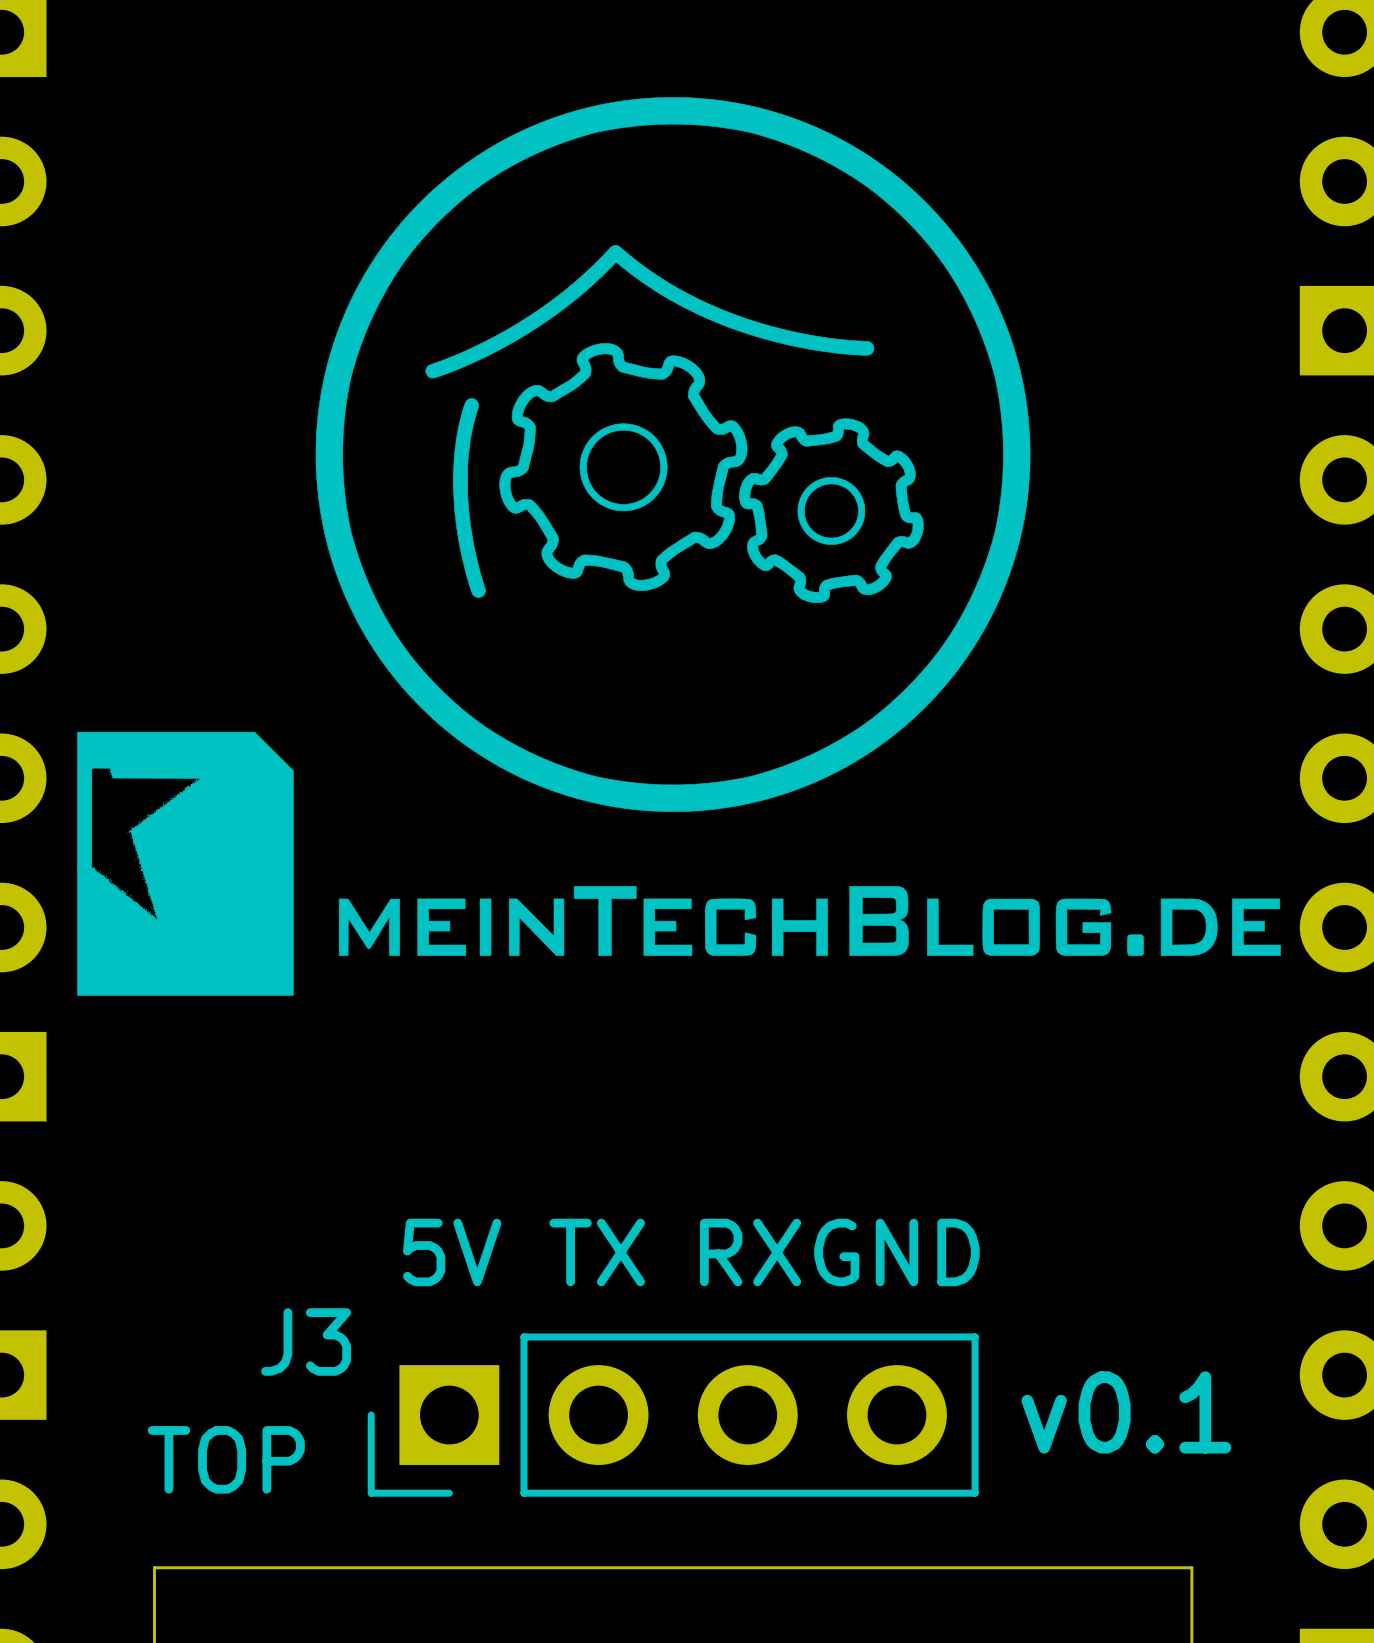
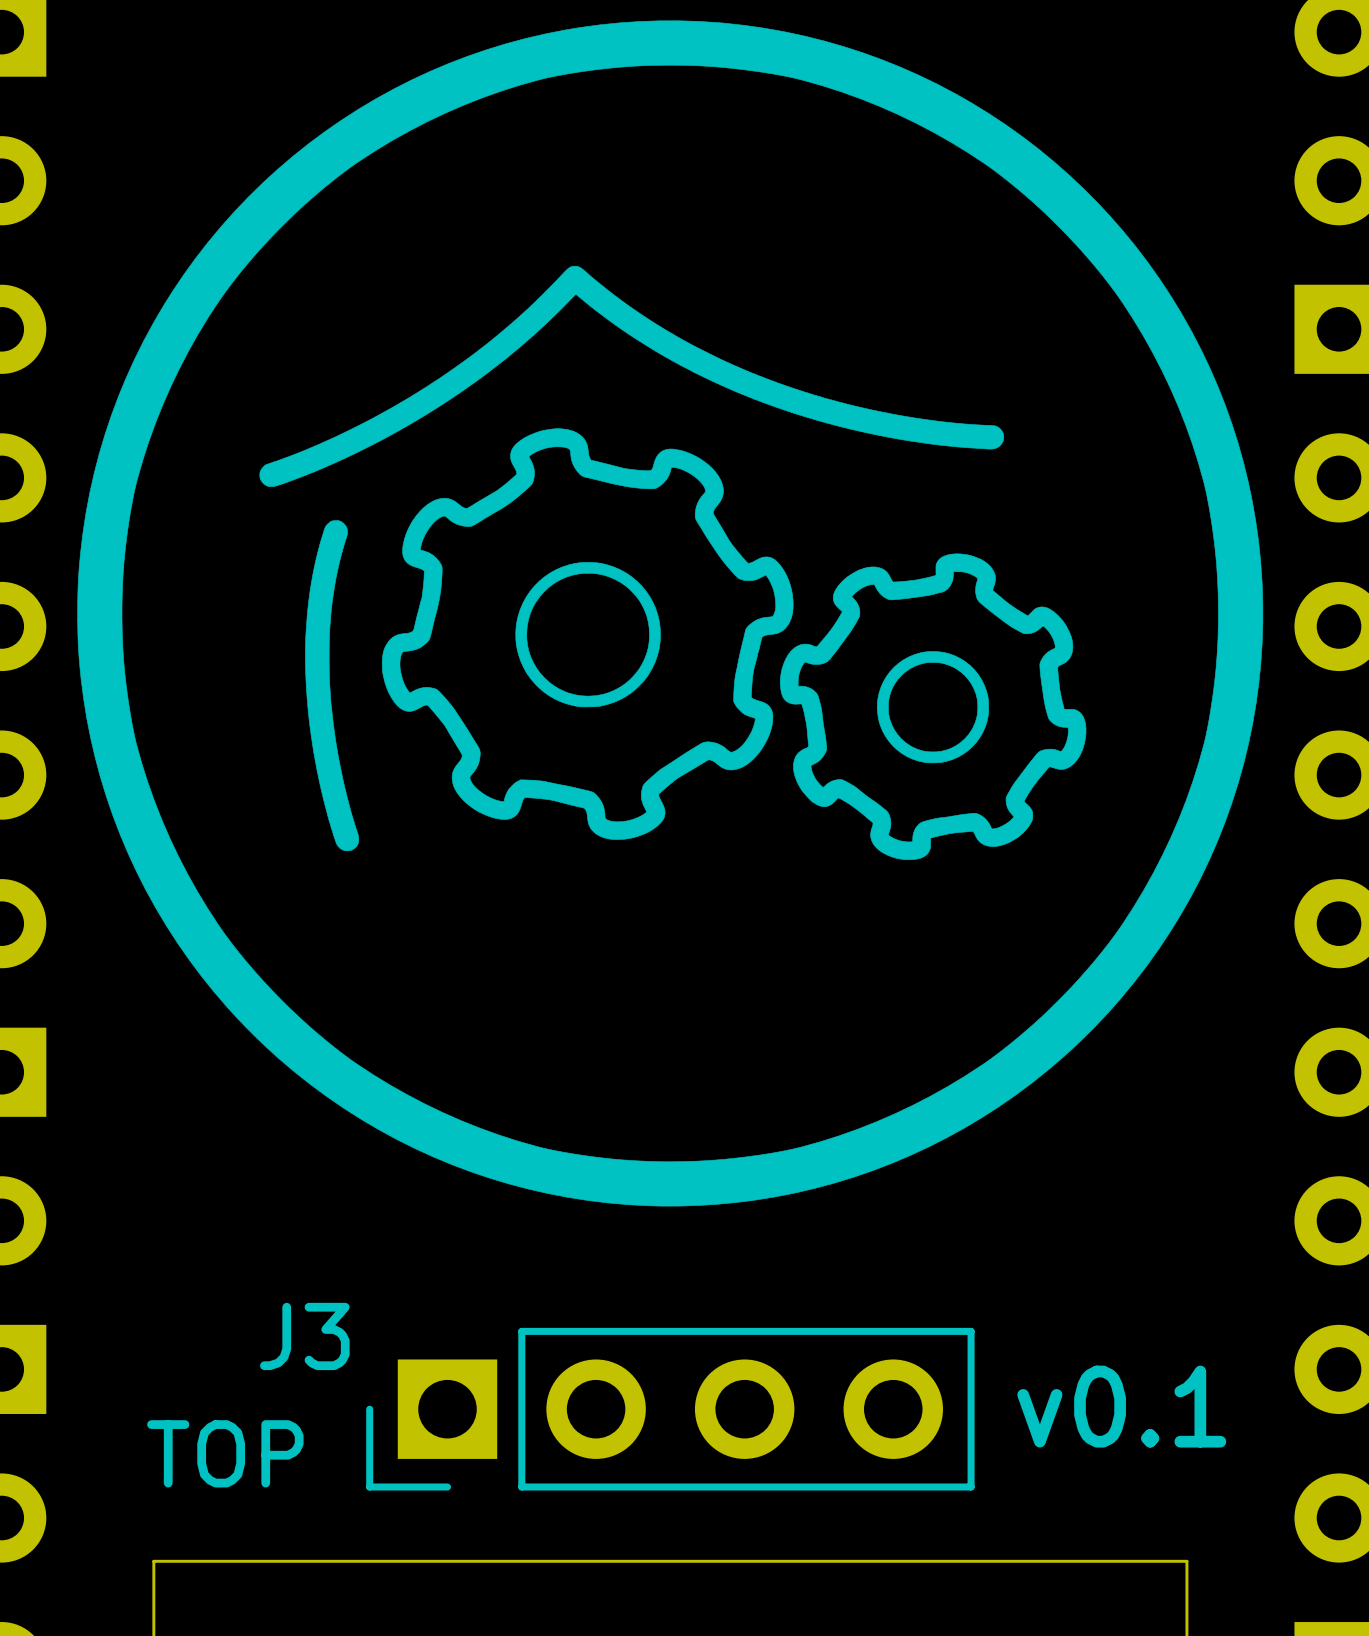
drawing: none -> [77, 20, 1264, 1207]
drawing: [77, 97, 1281, 996] -> none
text: 5V (452, 1252) -> none
text: TX (597, 1252) -> none
text: RX (750, 1252) -> none
text: GND (896, 1252) -> none

